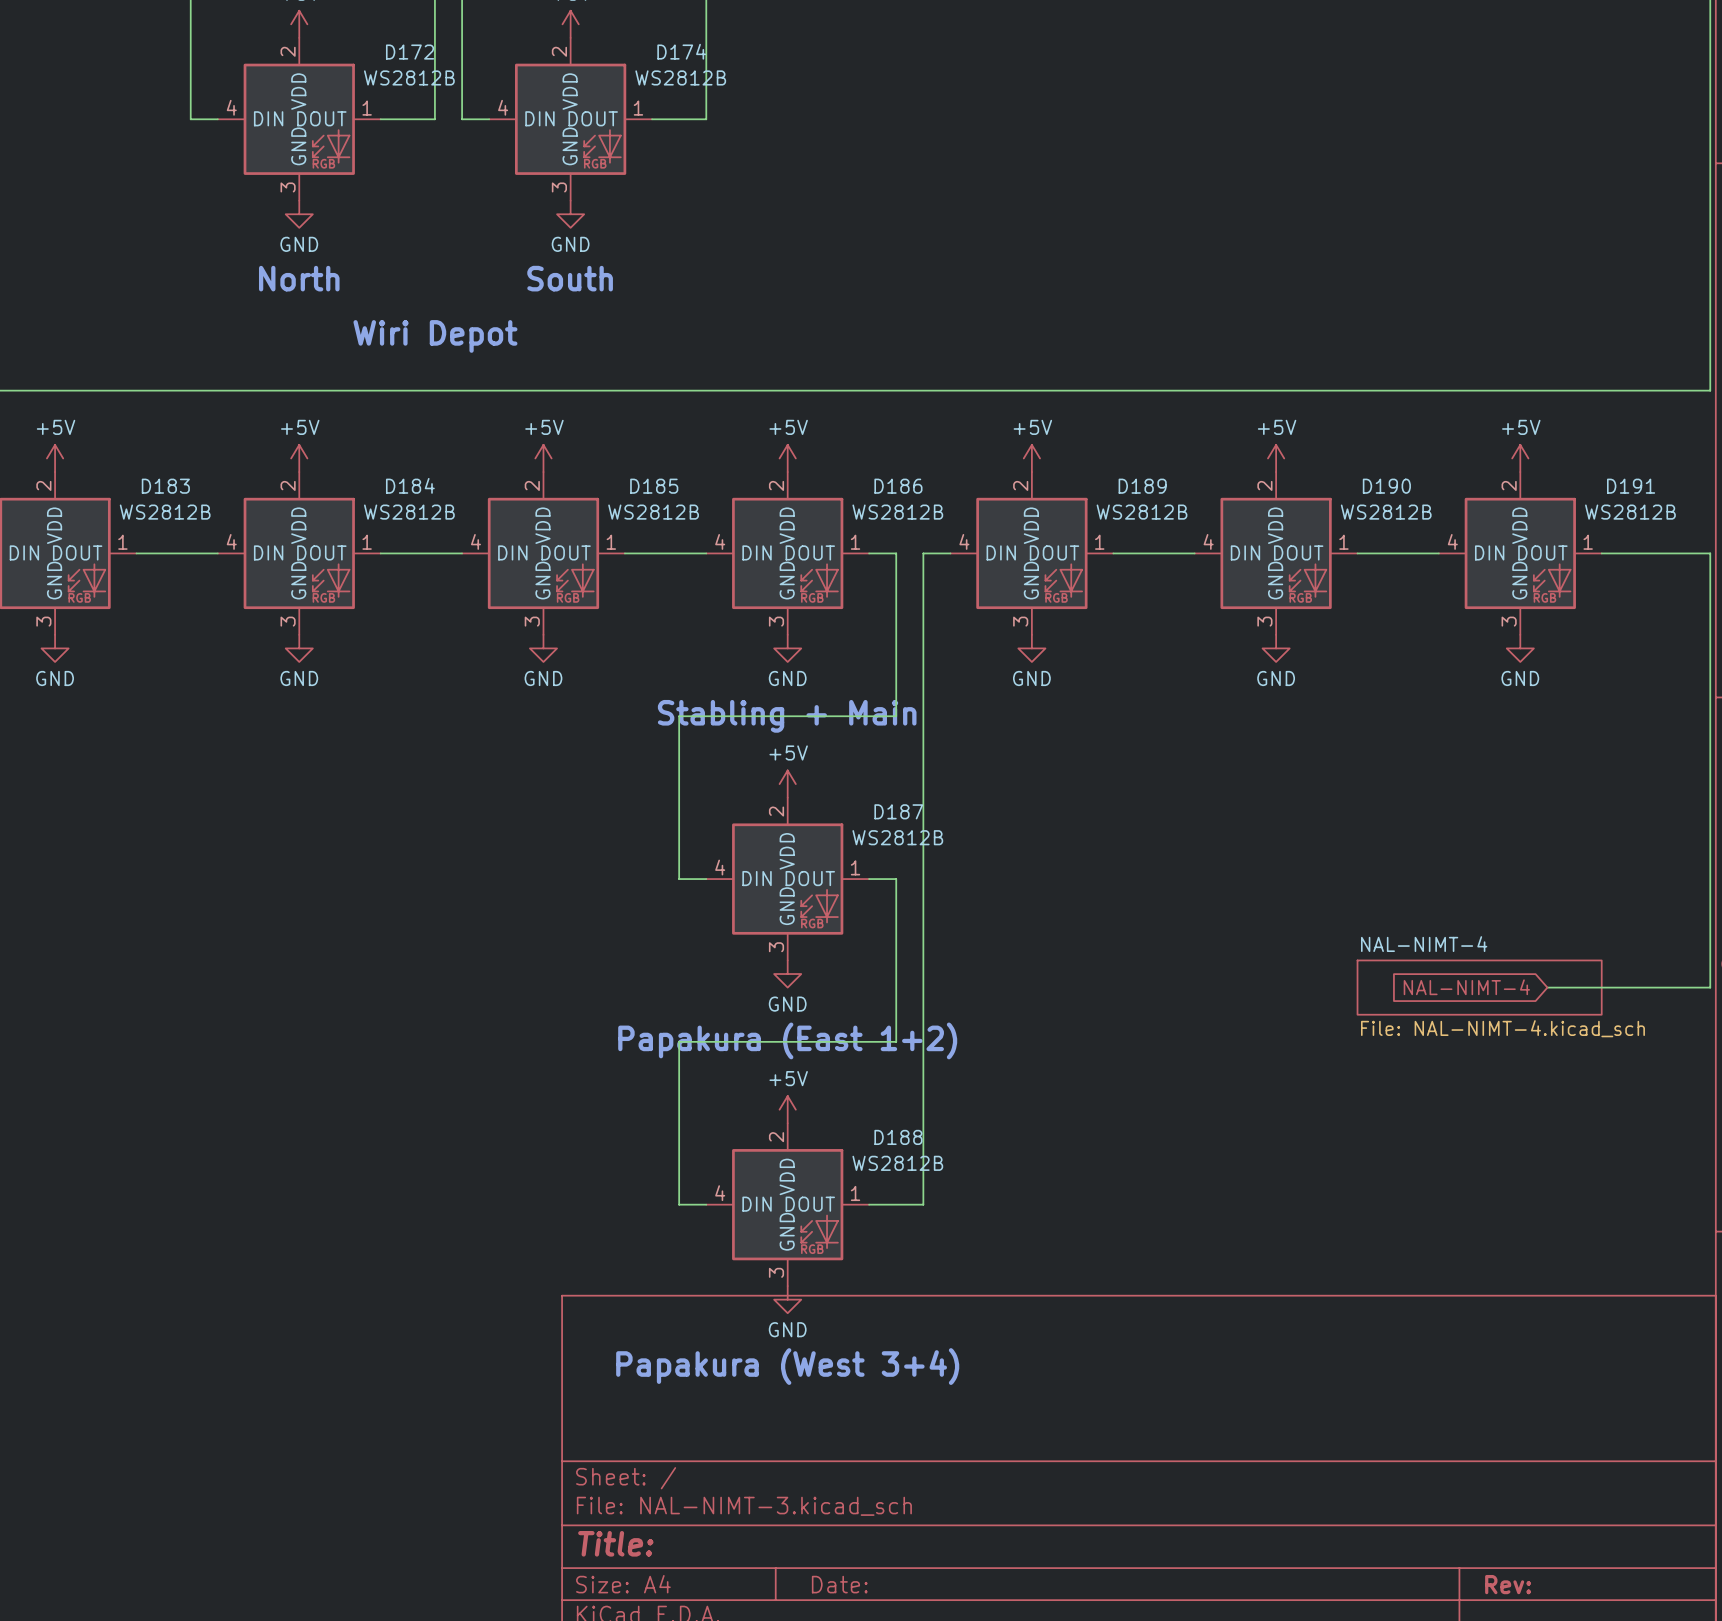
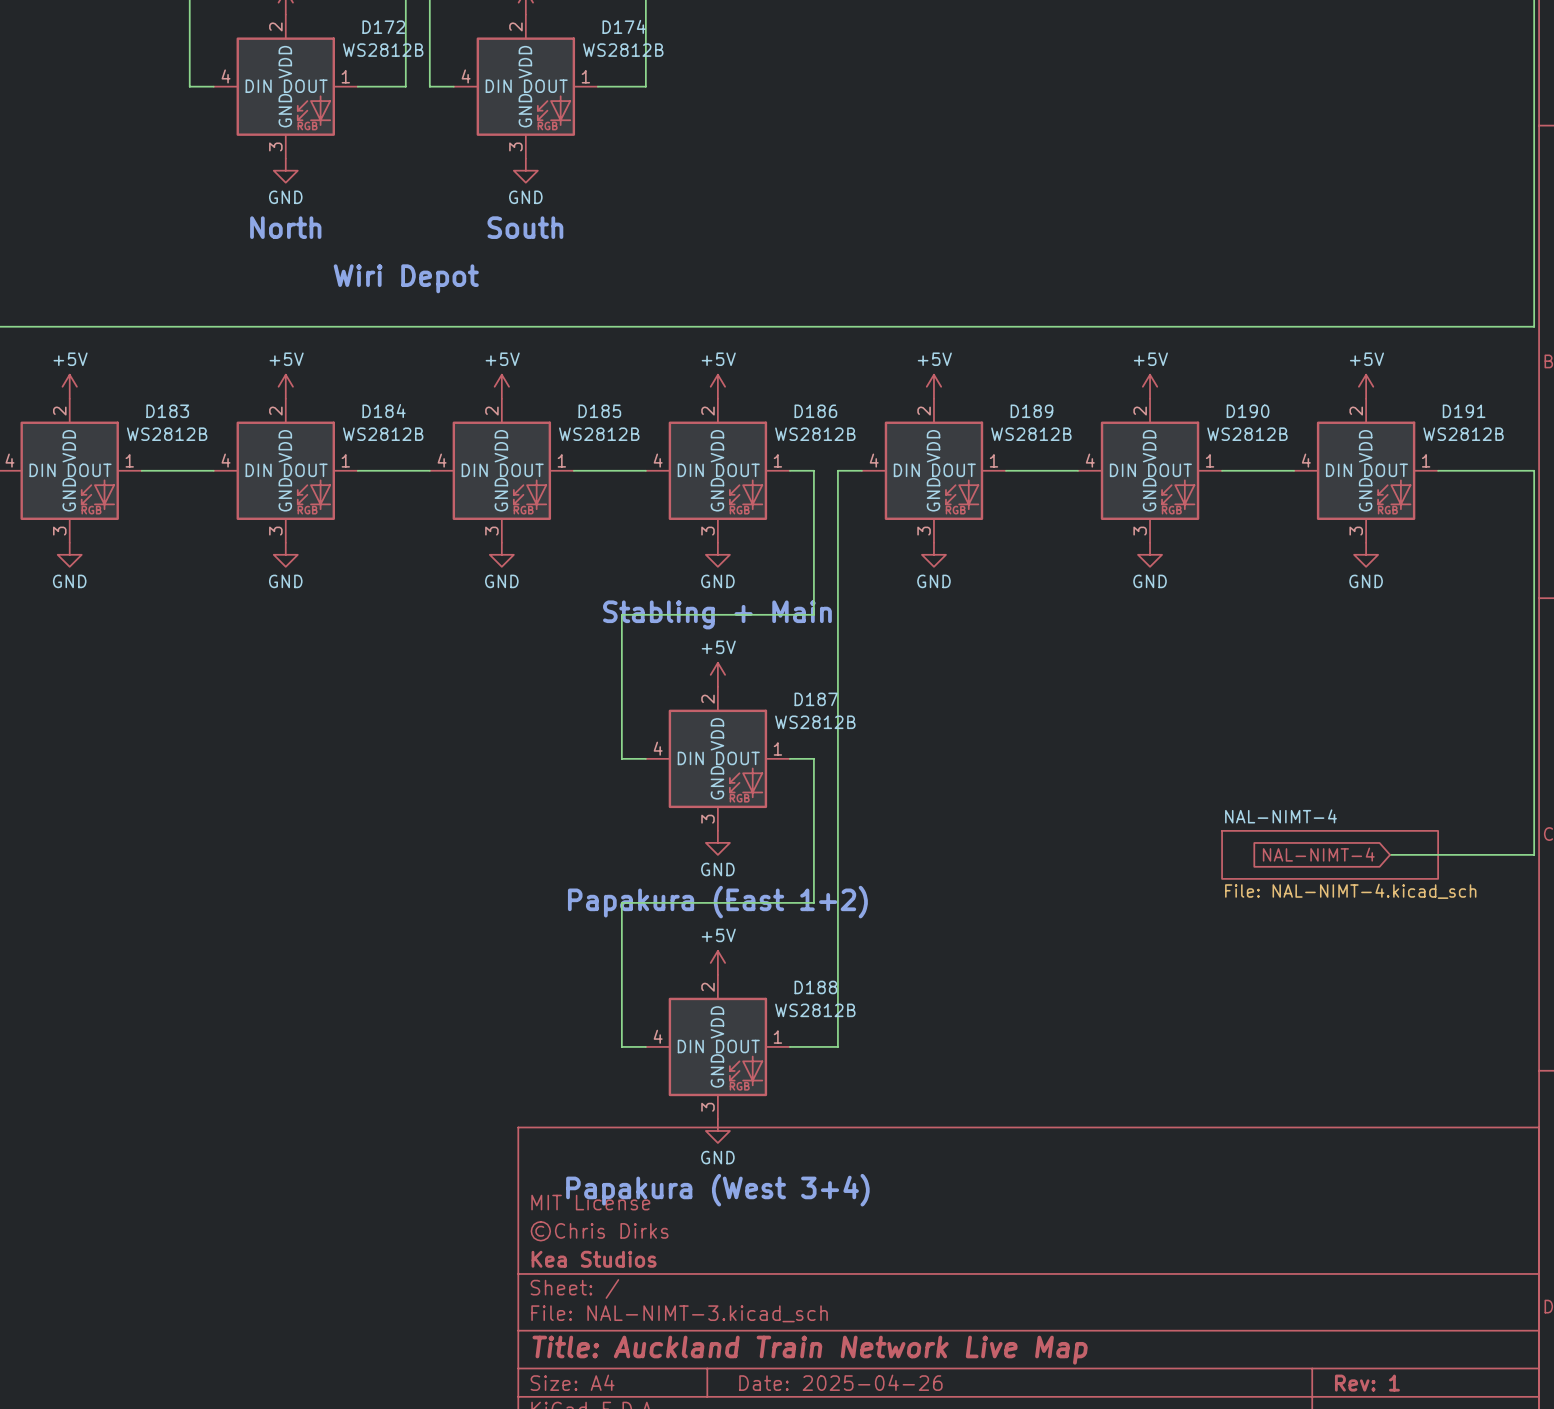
title block: none -> MIT License (590, 1202)
title block: none -> ©Chris Dirks (599, 1231)
title block: none -> Kea Studios (594, 1259)
title block: Title: (615, 1543) -> Title: Auckland Train Network Live Map (810, 1350)
title block: Date: (839, 1584) -> Date: 2025-04-26 (840, 1382)
title block: Rev: (1508, 1584) -> Rev: 1 (1367, 1383)

